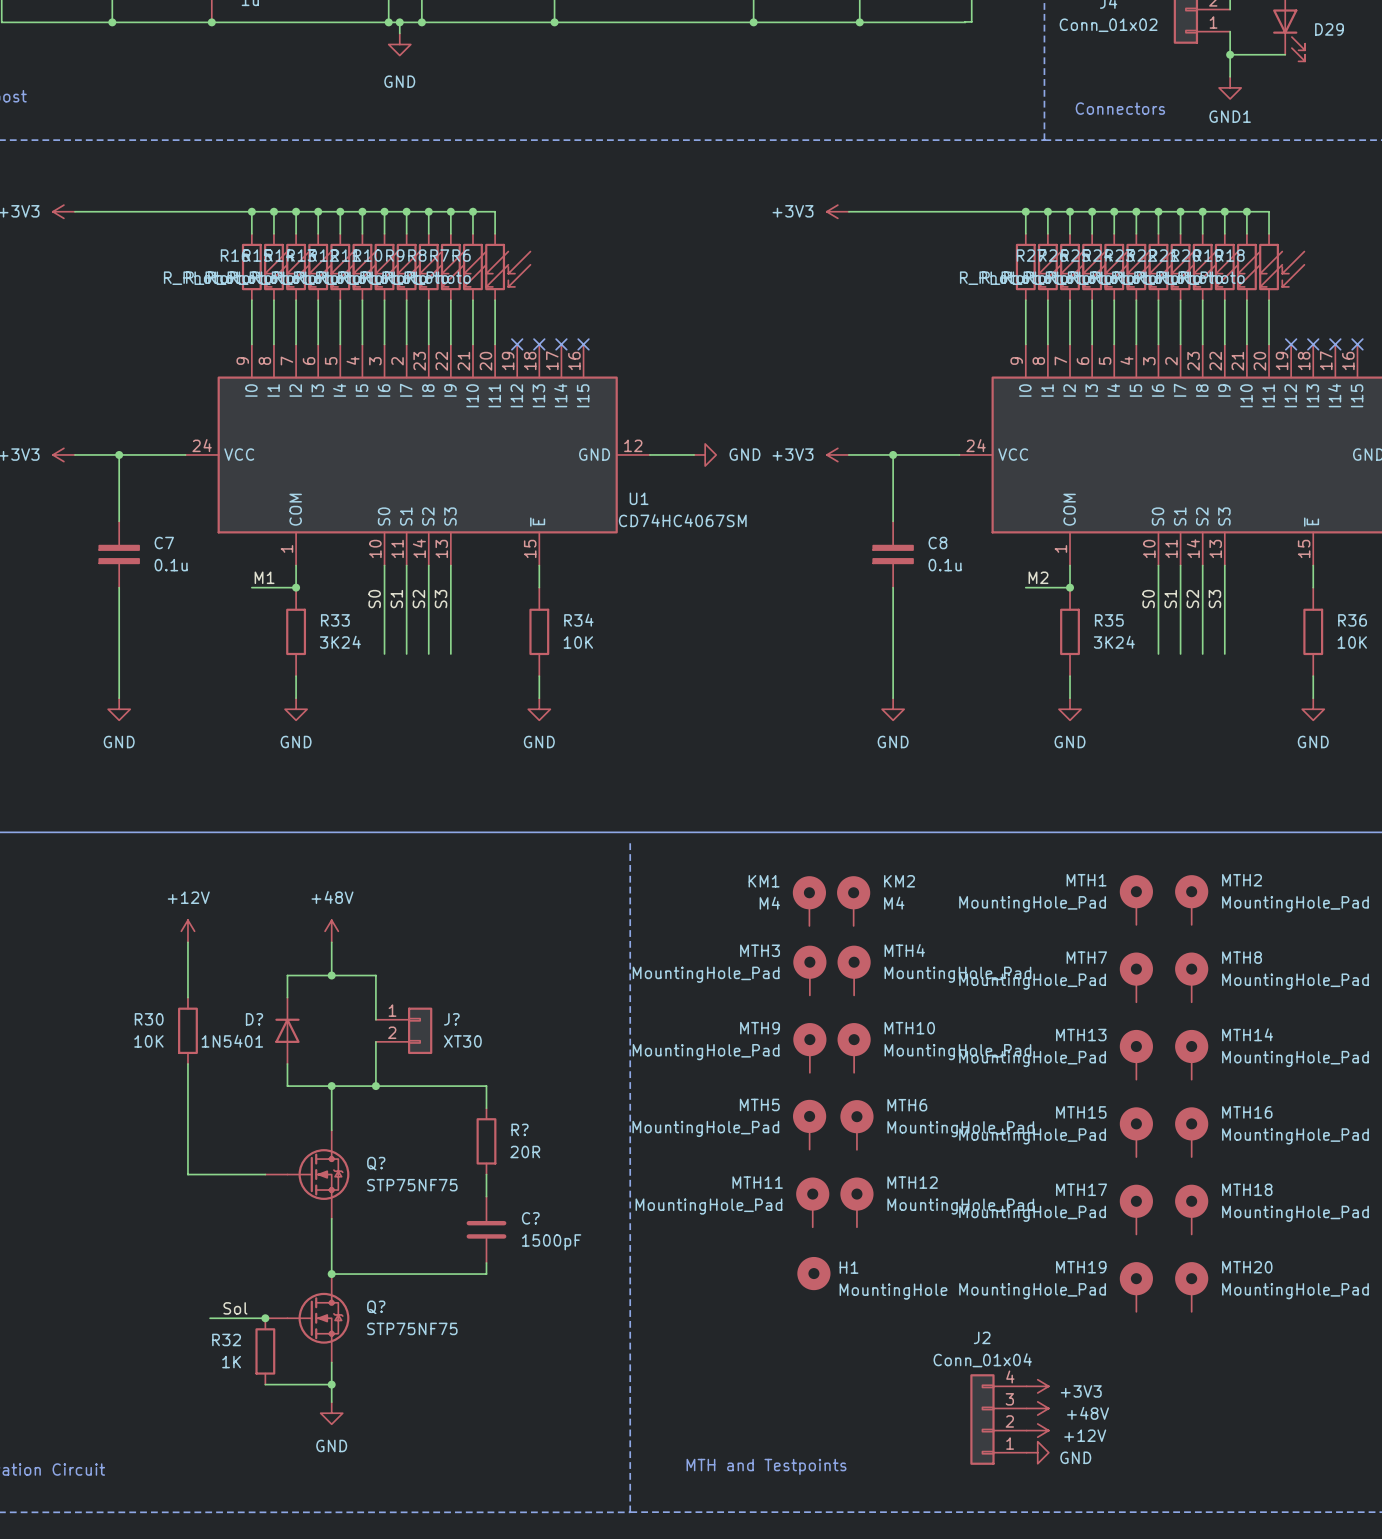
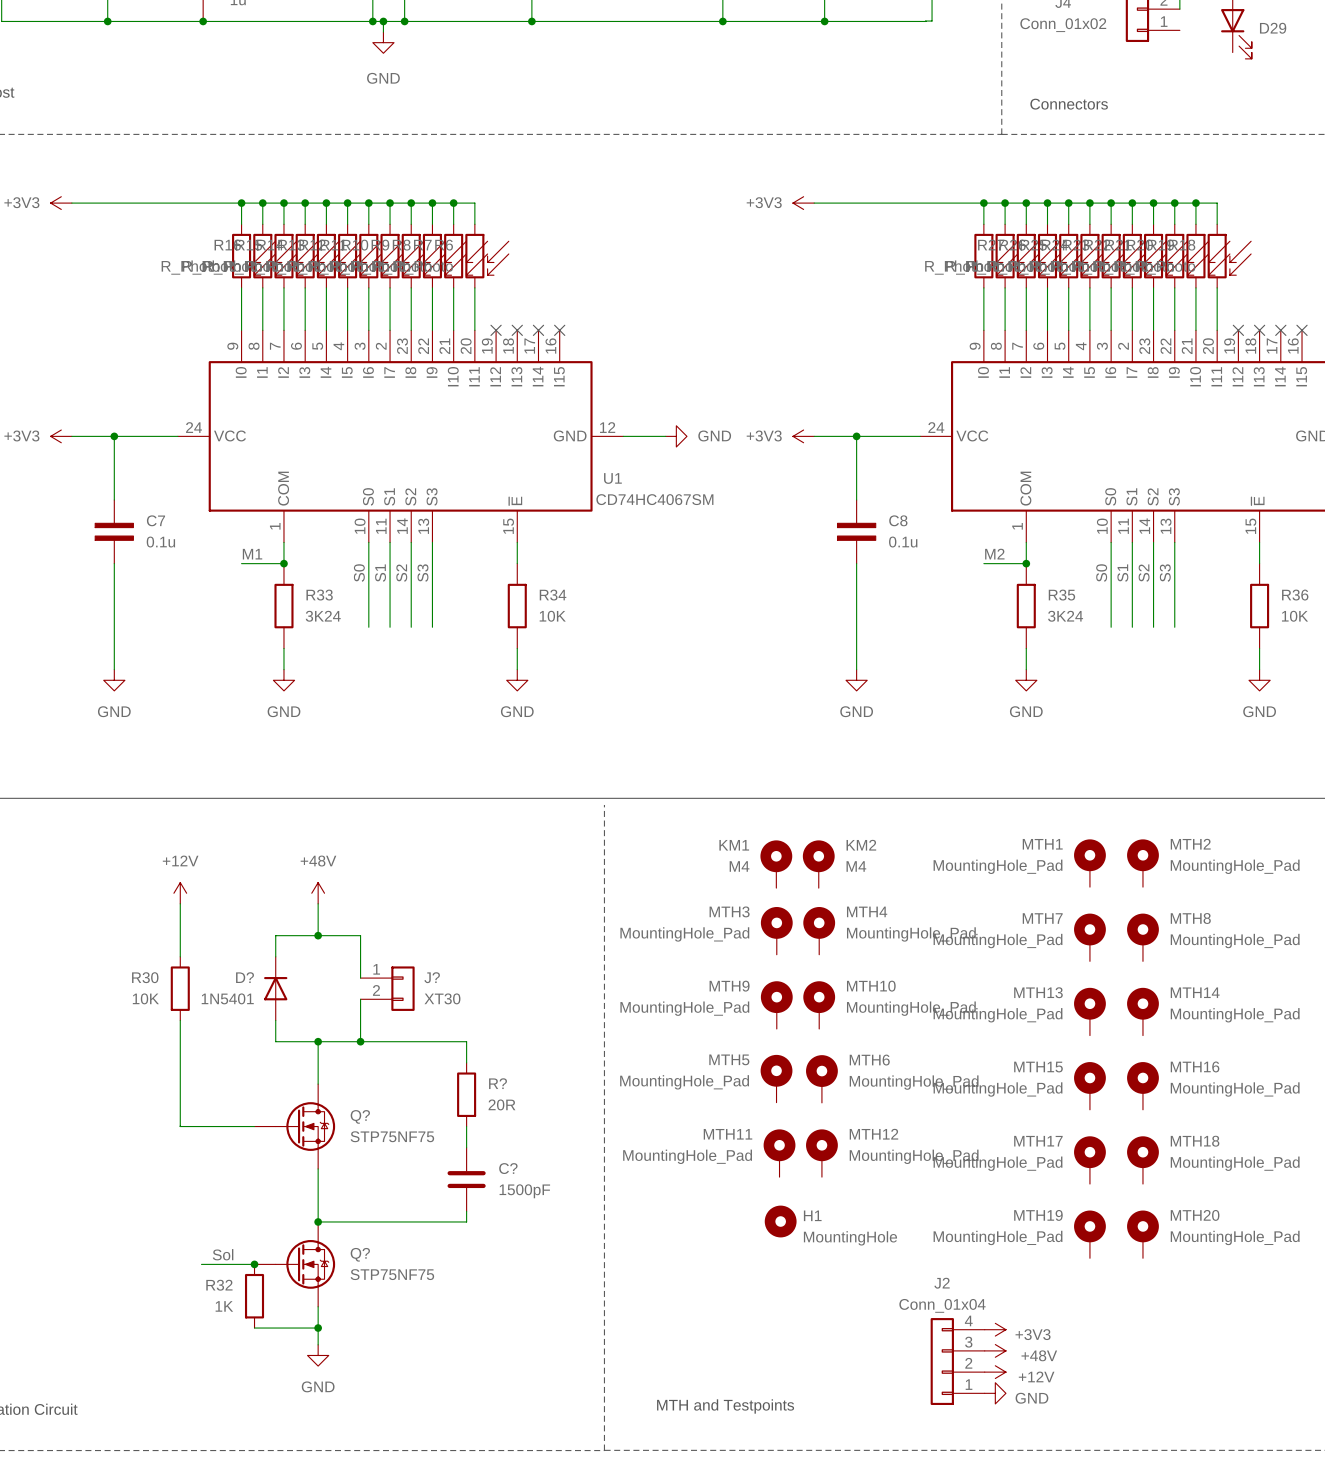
wire: (1230, 31) (1230, 76) -> none
wire: (1230, 54) (1285, 54) -> none
junction: (1230, 54) -> none
power symbol: GND1 (1230, 87) -> none

